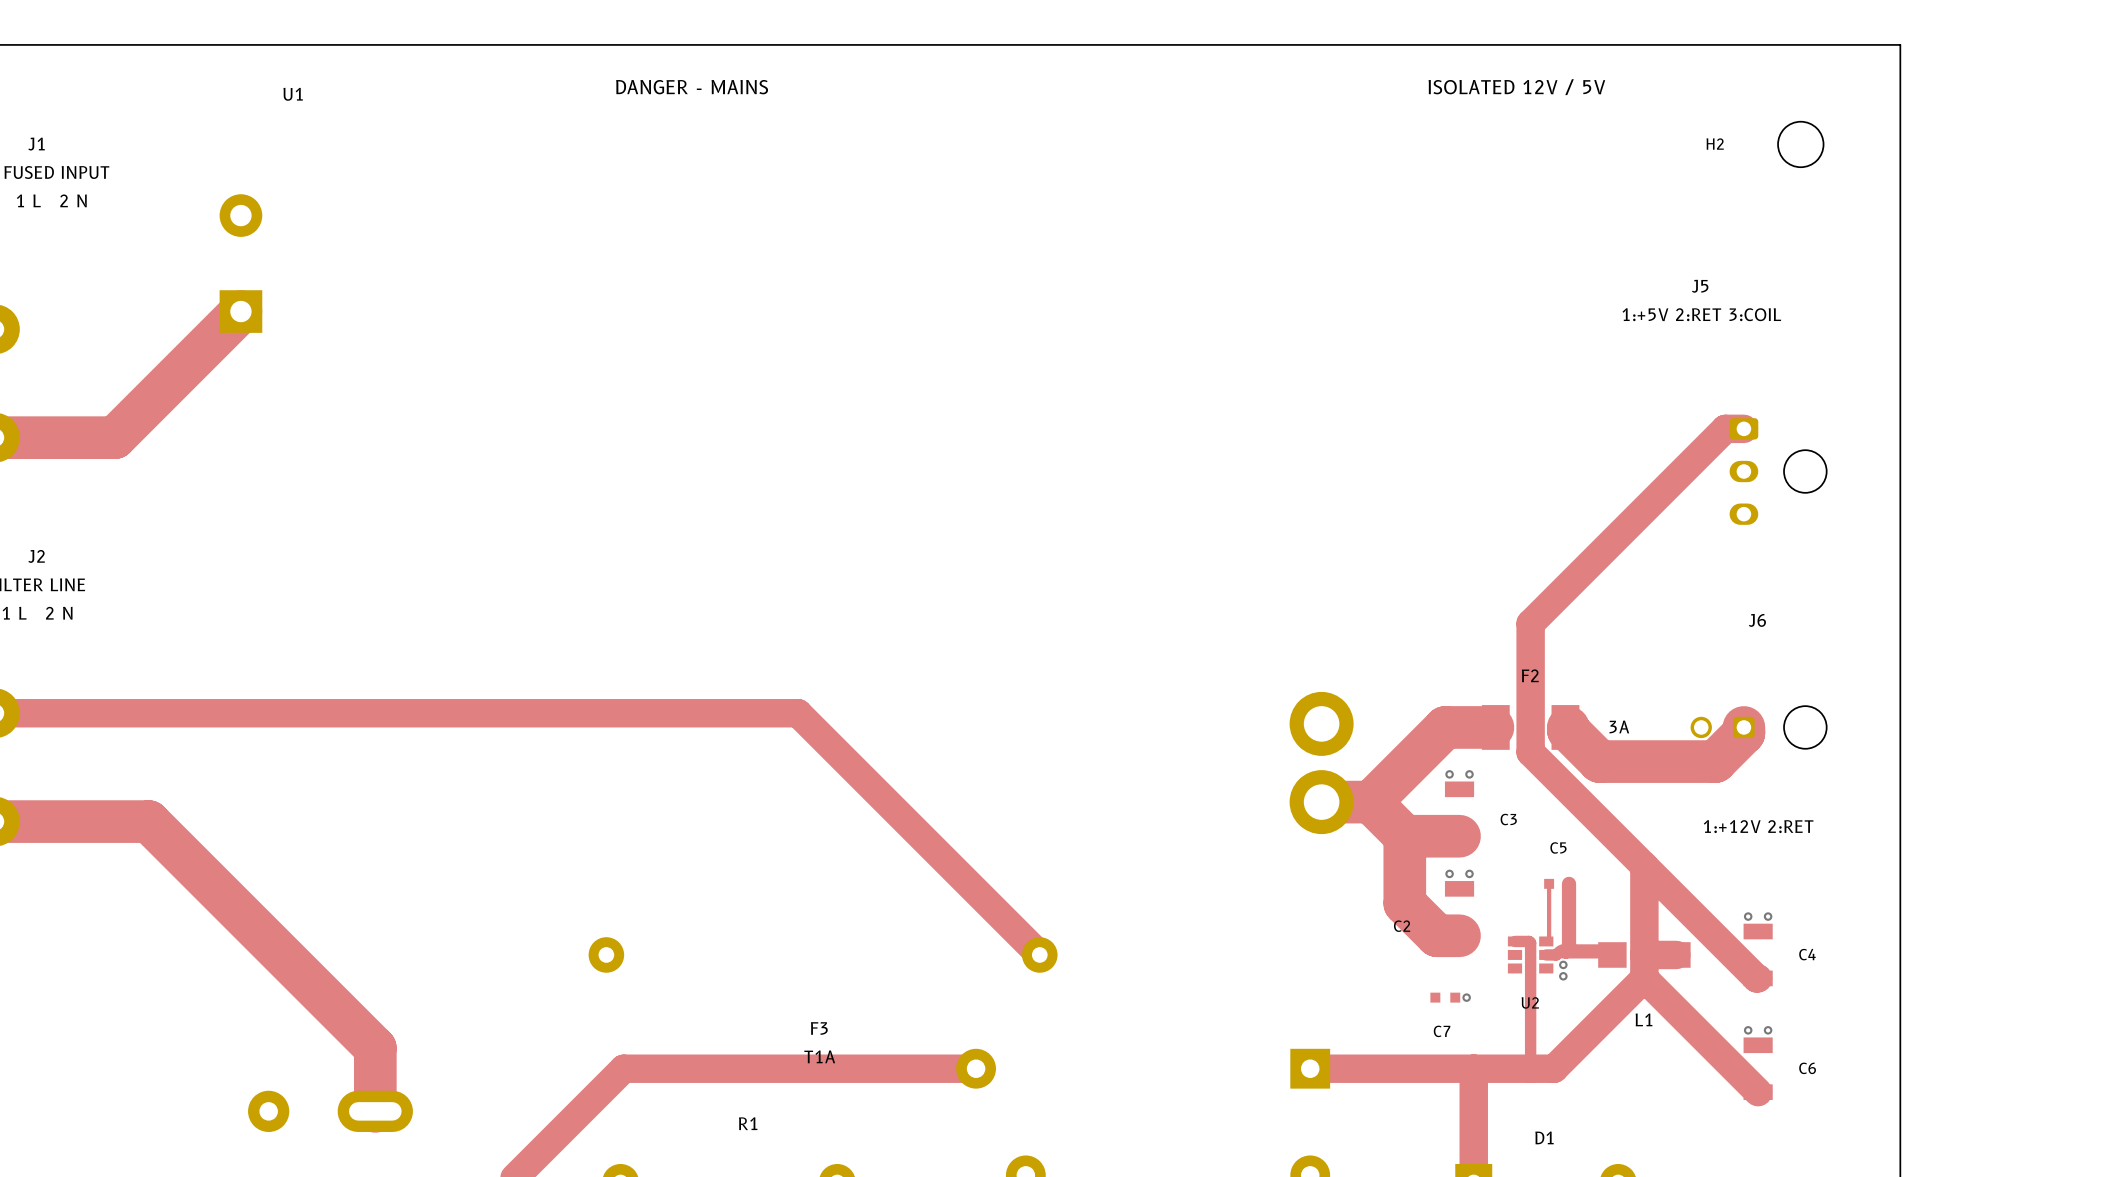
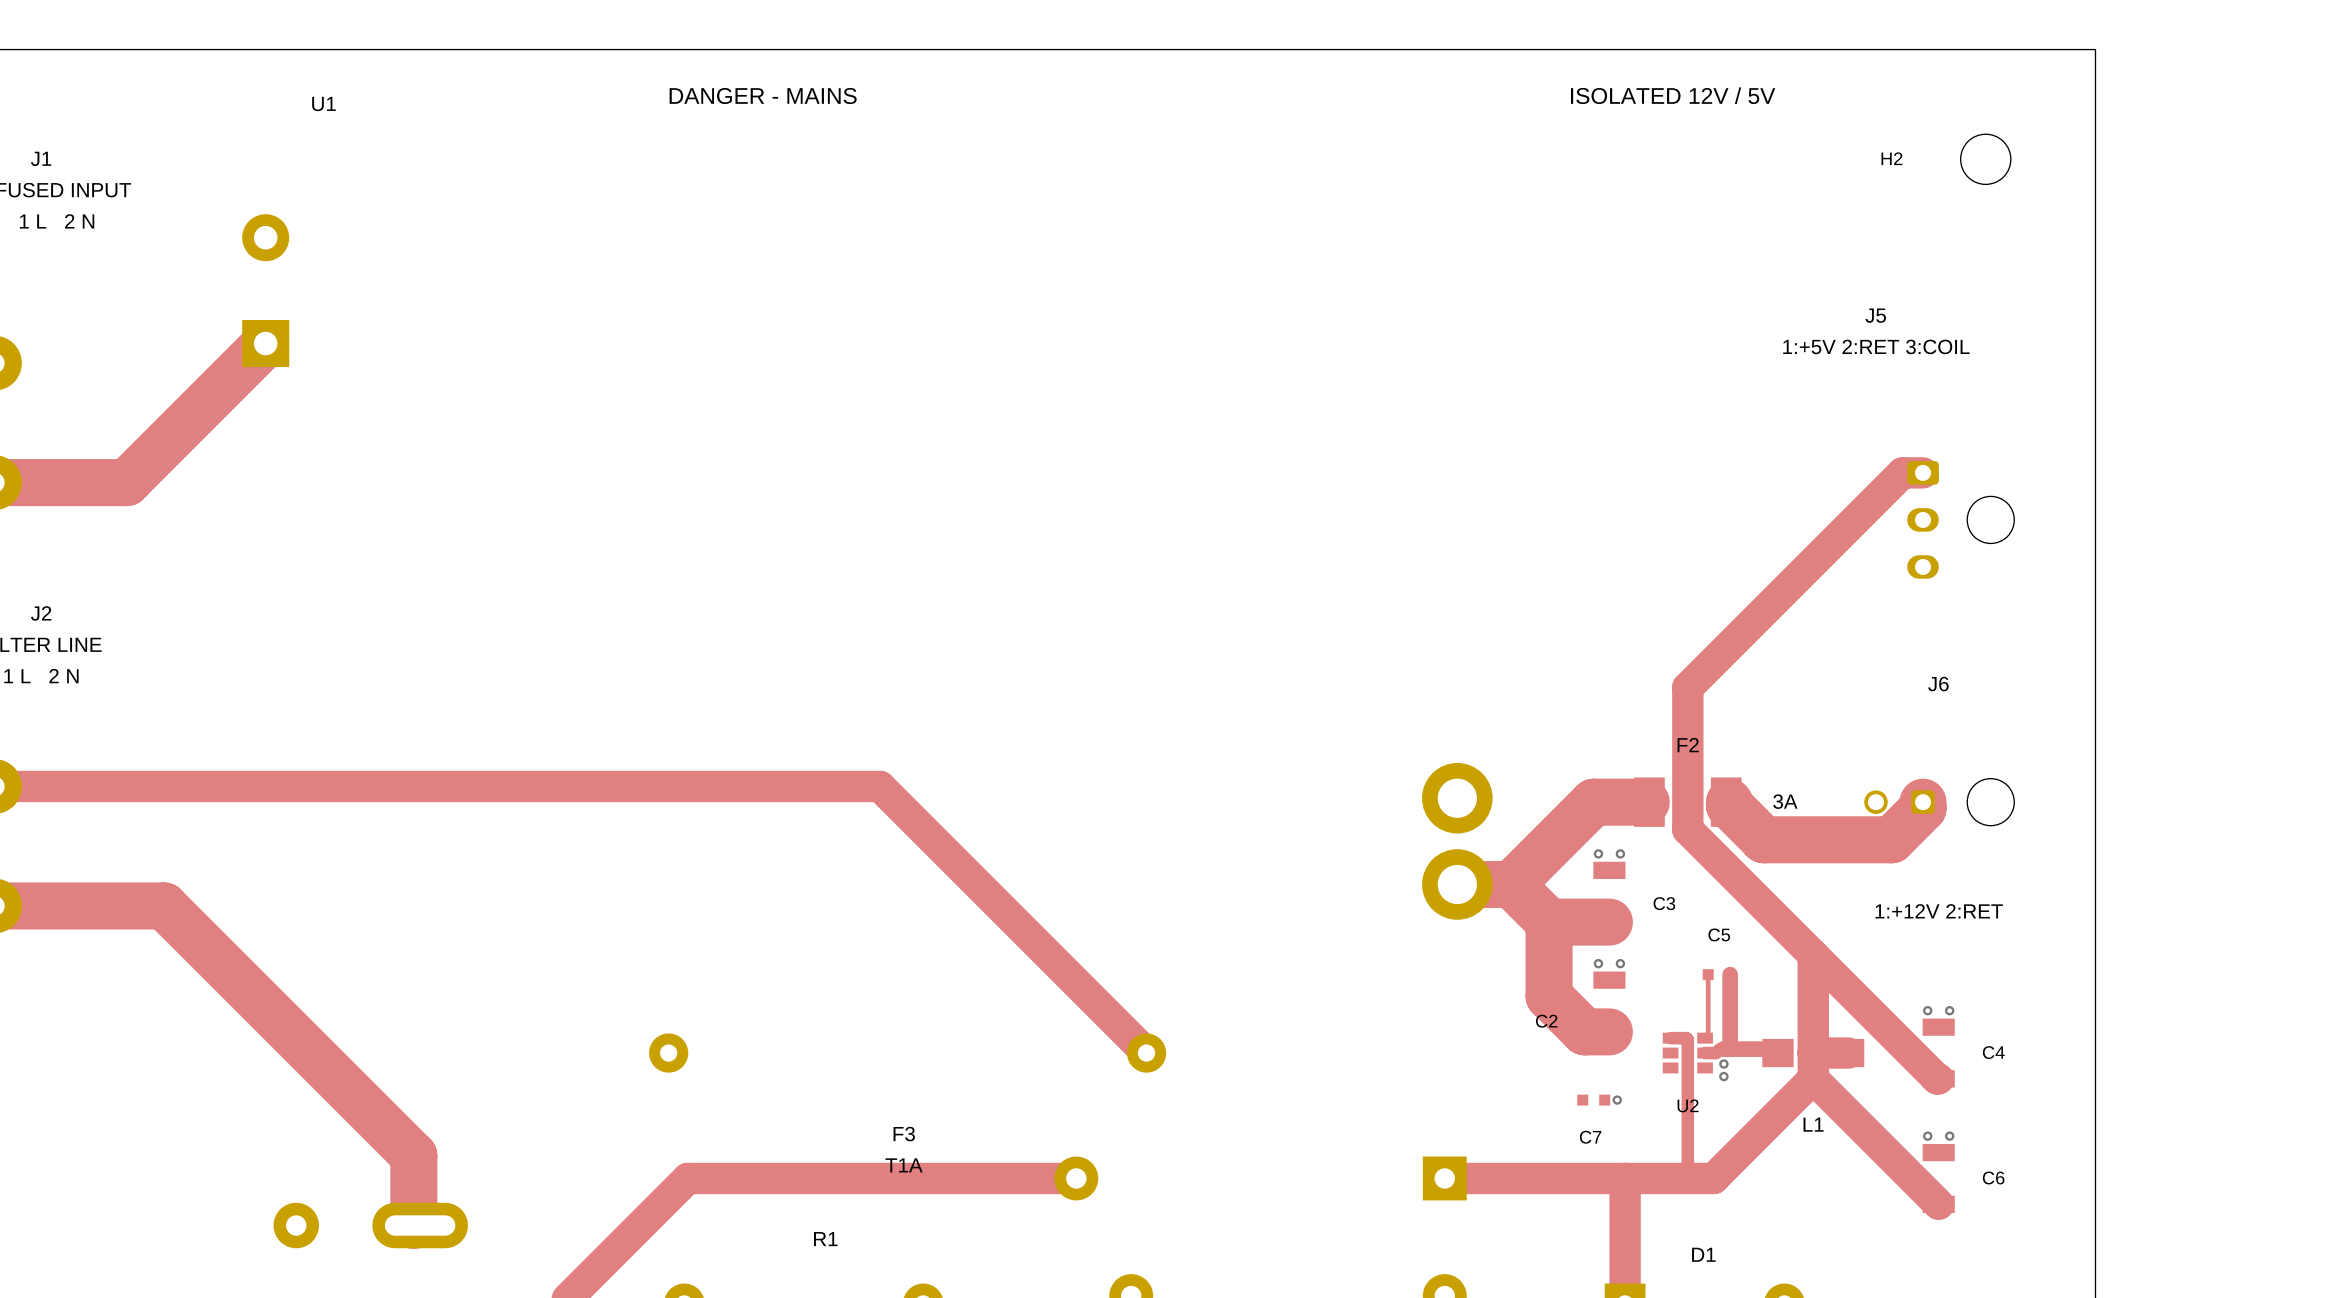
part footprint: [248, 1090, 414, 1132] -> [273, 1202, 468, 1249]

